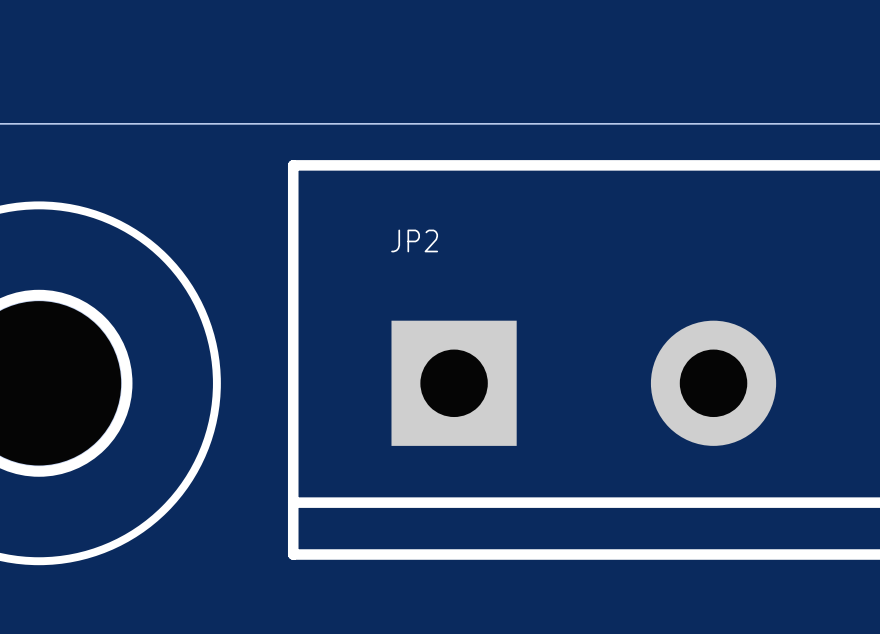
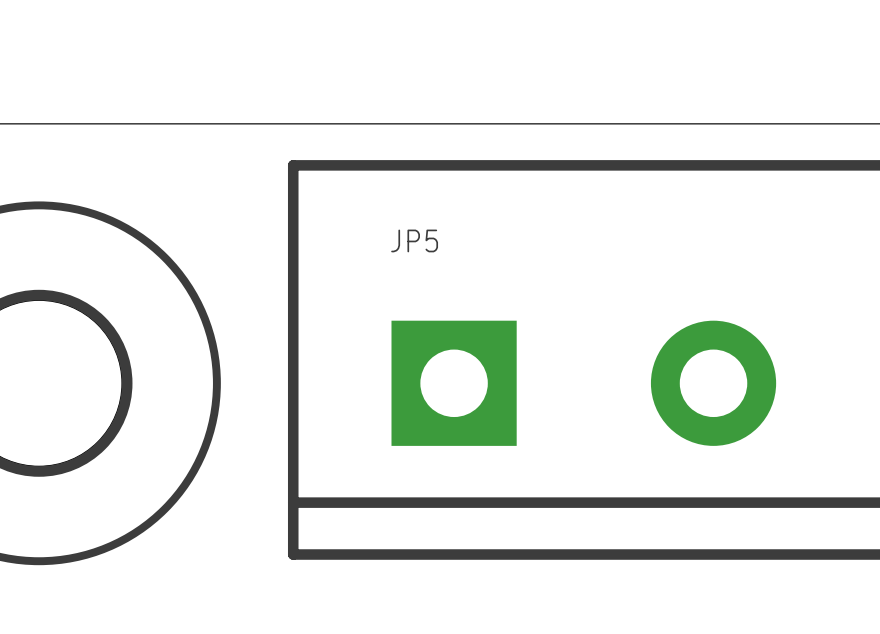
JP2 name: JP2 (414, 240) -> JP5 (414, 240)

